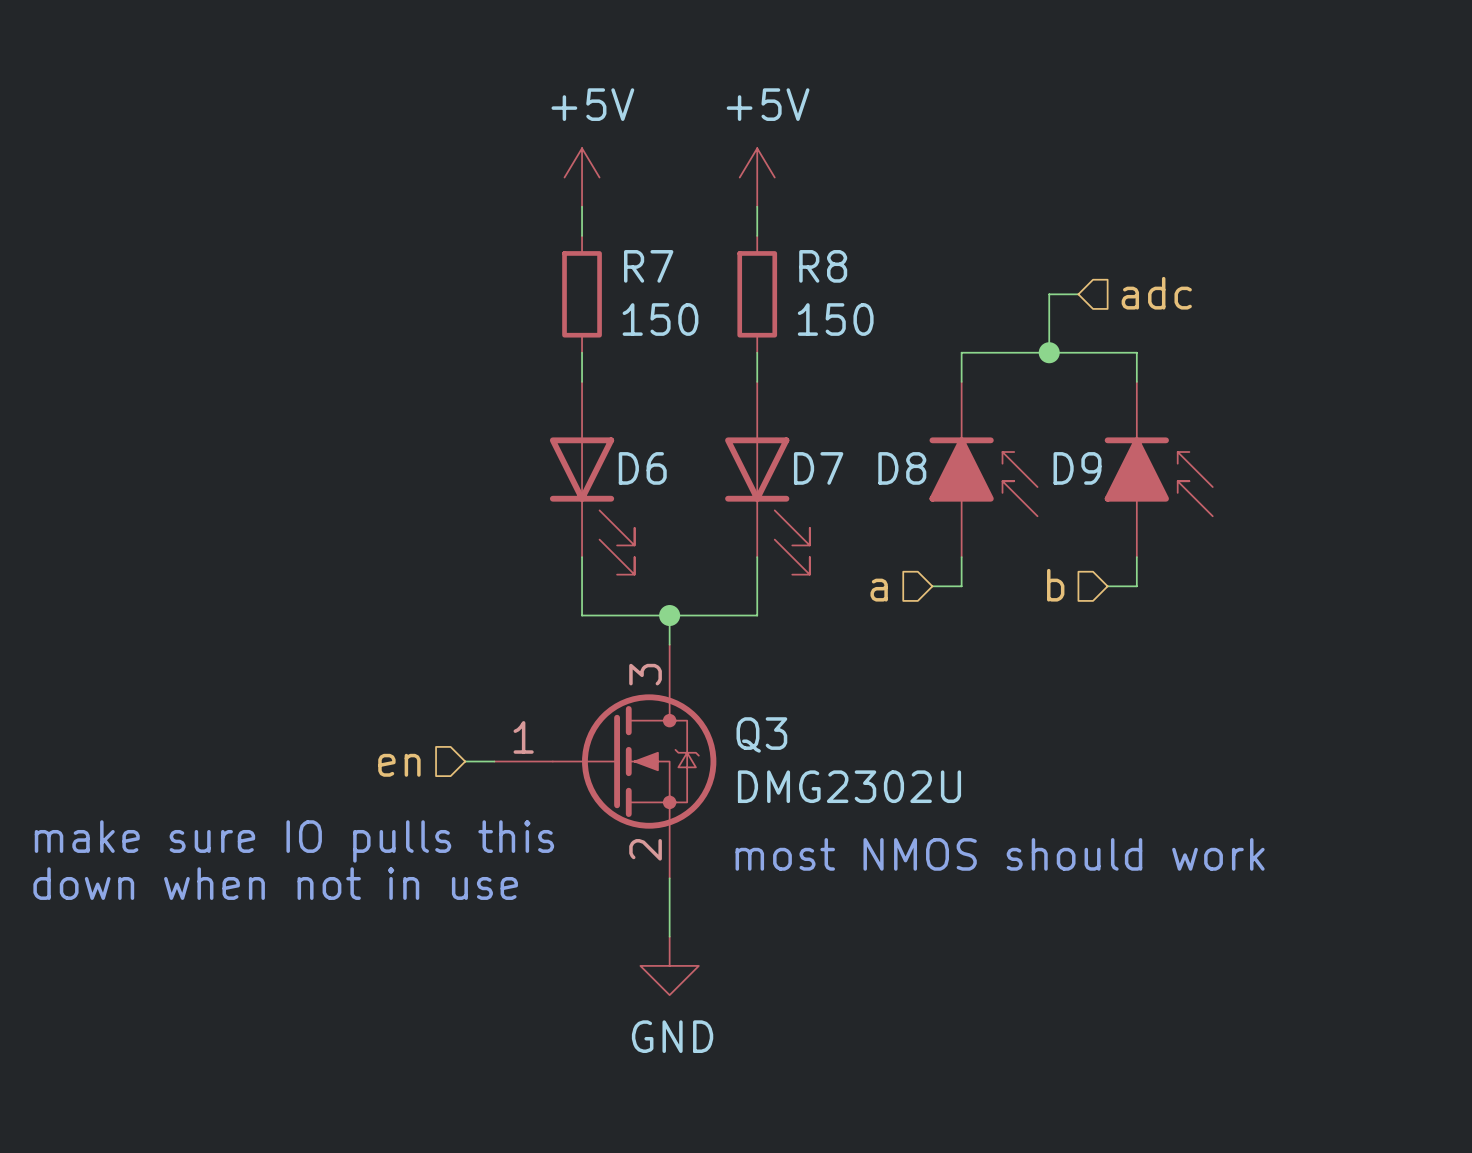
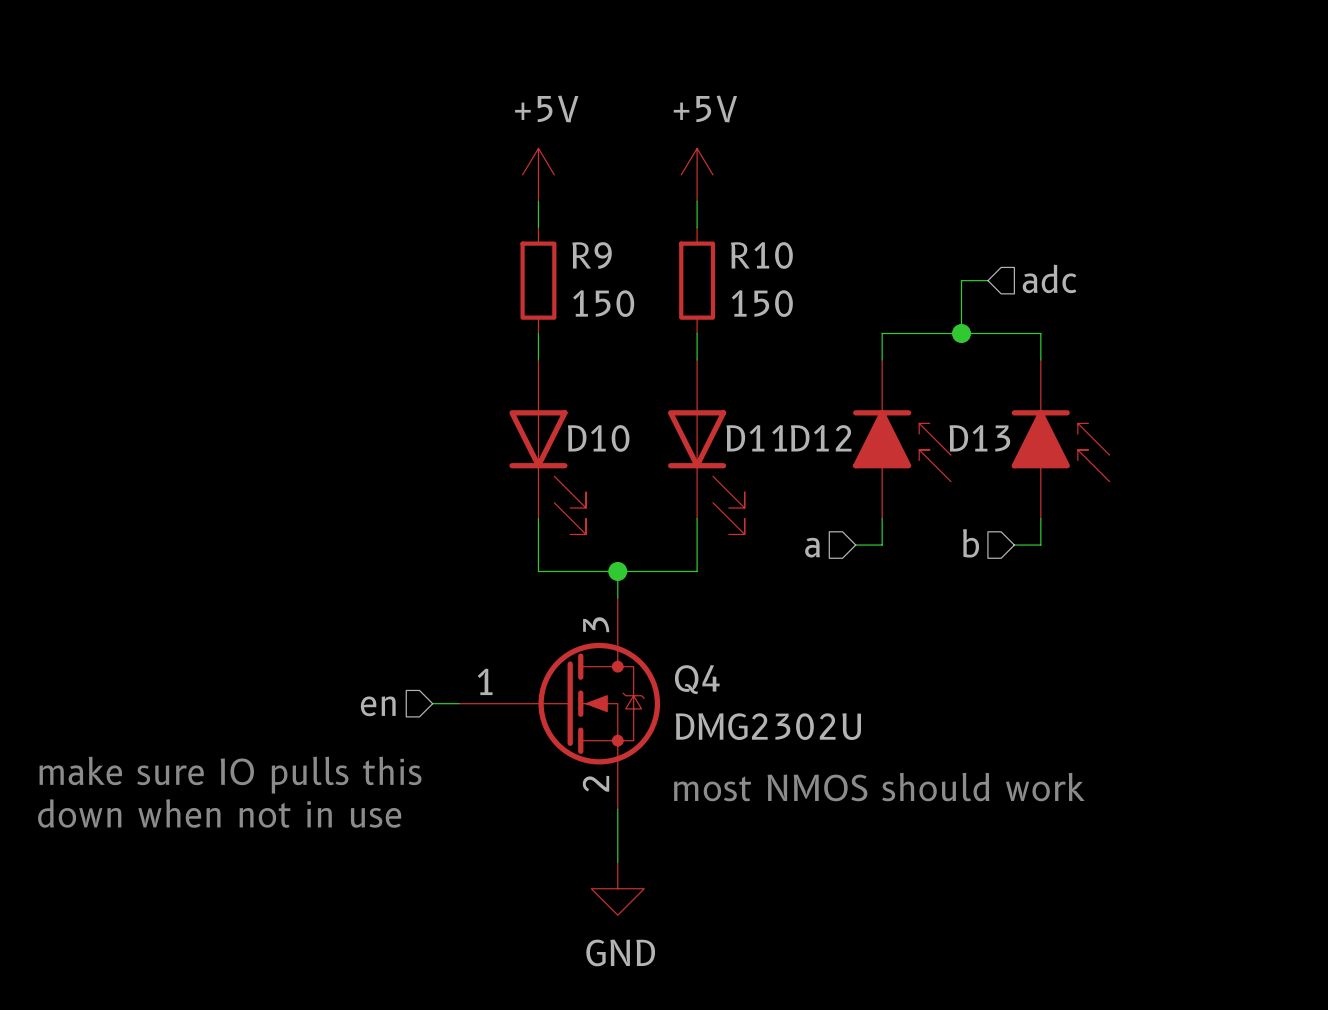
R7 name: R7 (648, 266) -> R9 (592, 255)
R8 name: R8 (823, 266) -> R10 (761, 255)
D6 name: D6 (642, 468) -> D10 (598, 438)
D7 name: D7 (818, 468) -> D11 (756, 438)
D8 name: D8 (902, 468) -> D12 (821, 438)
D9 name: D9 (1077, 468) -> D13 (979, 438)
Q3 name: Q3 (761, 734) -> Q4 (697, 679)

